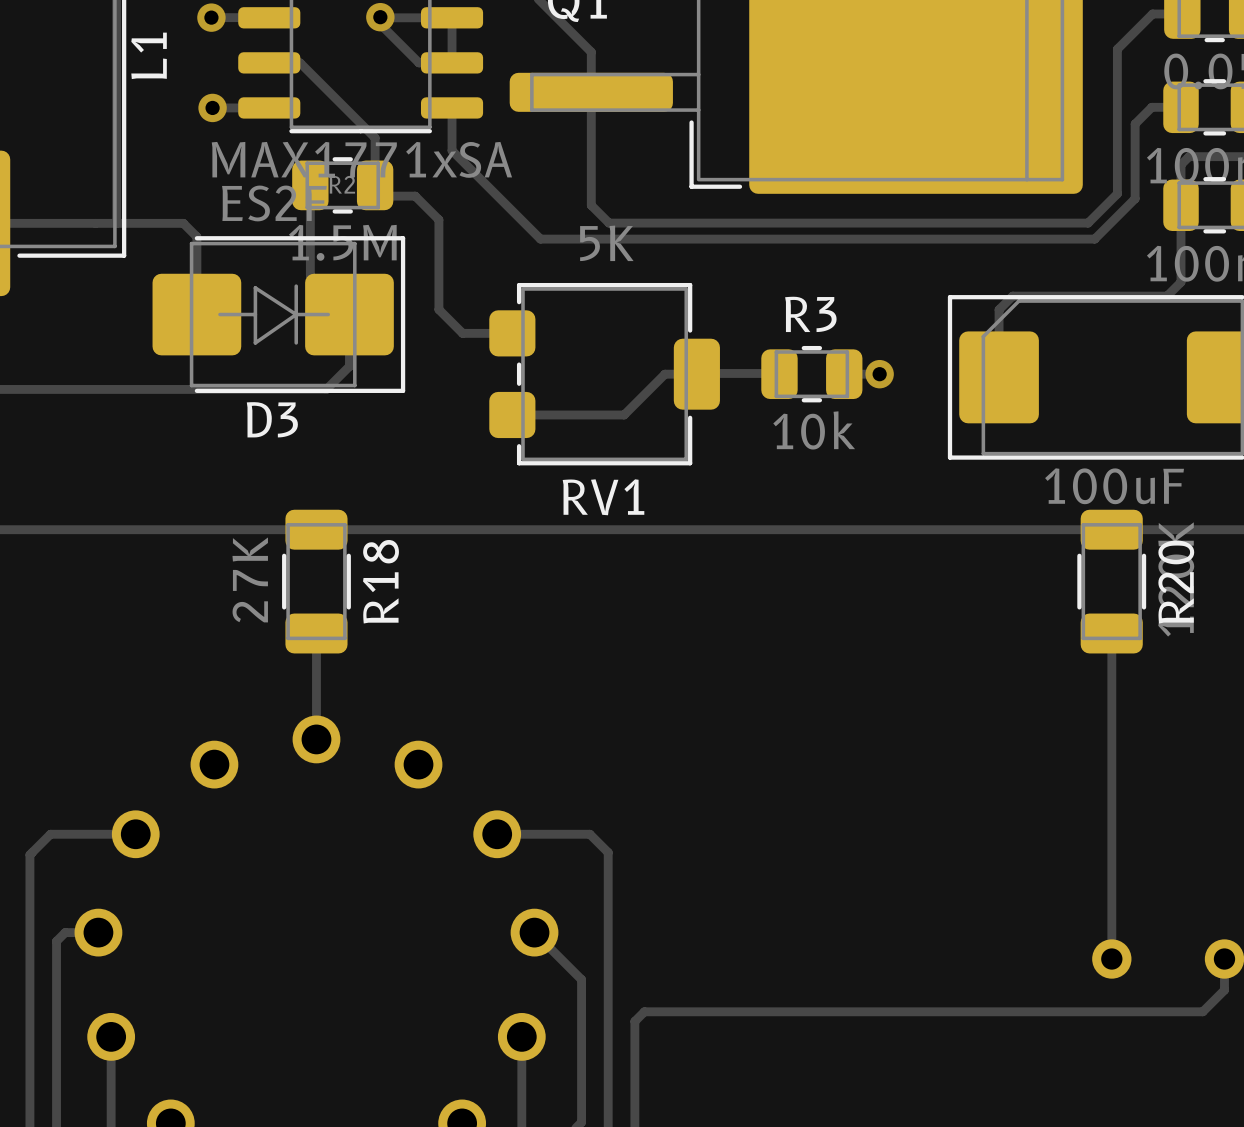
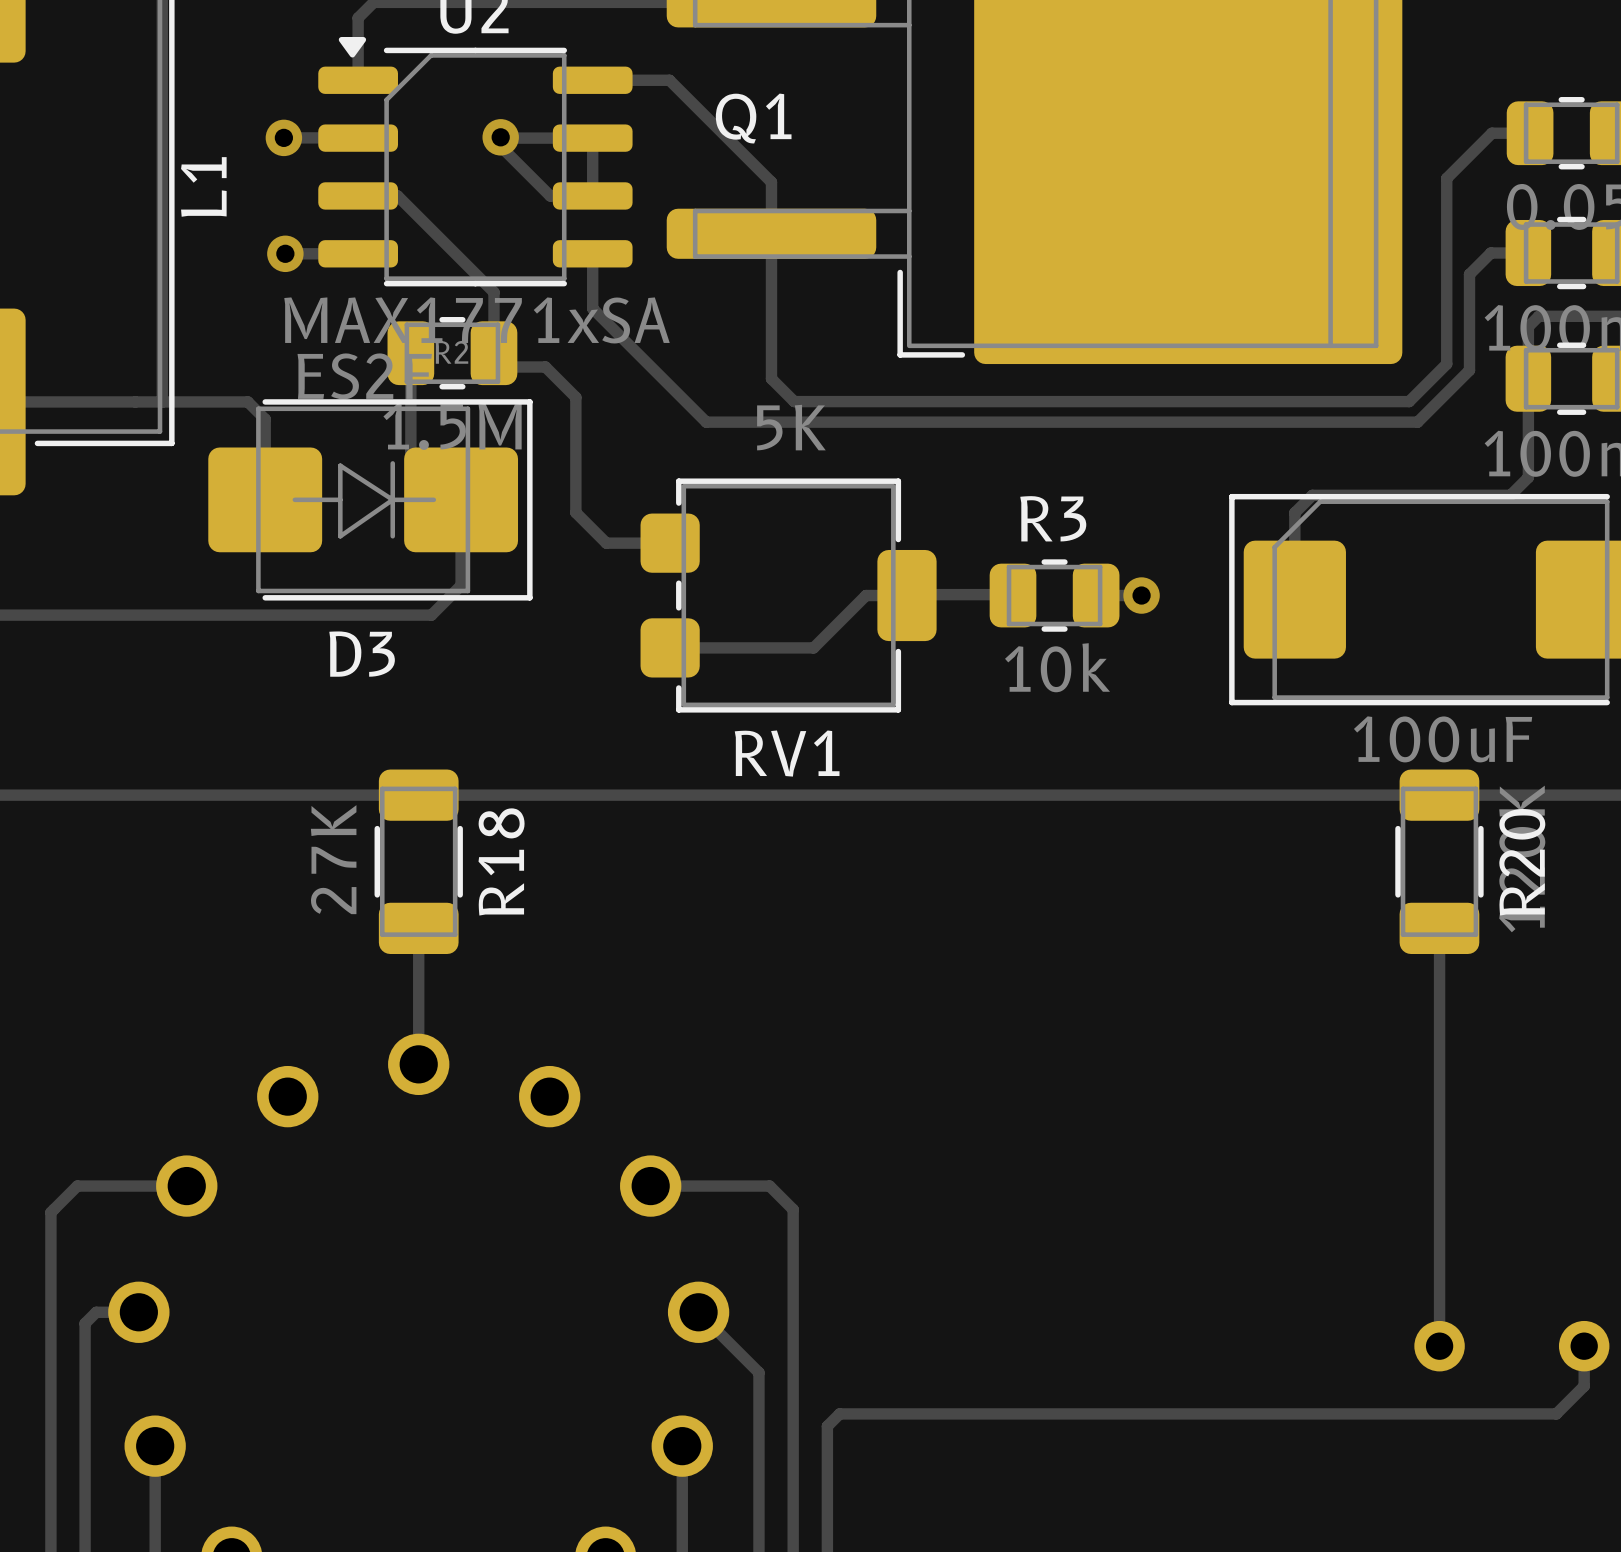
D3 position: (278, 314) -> (370, 499)

